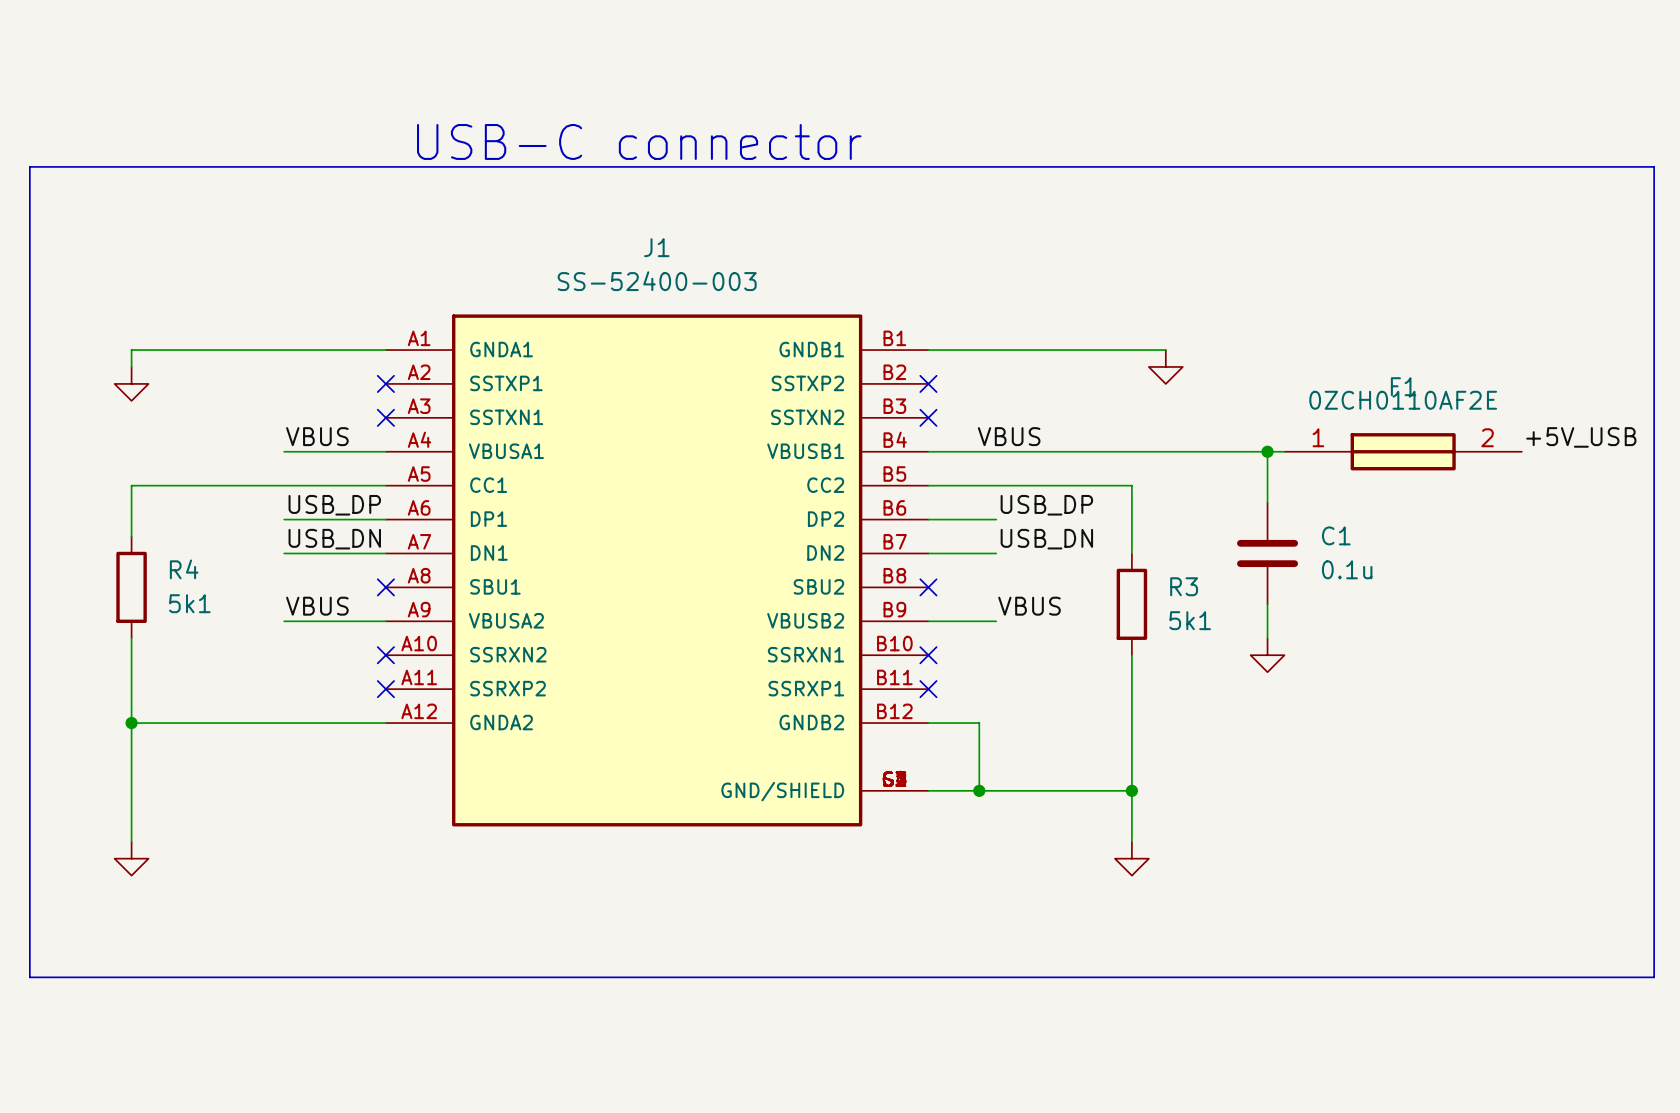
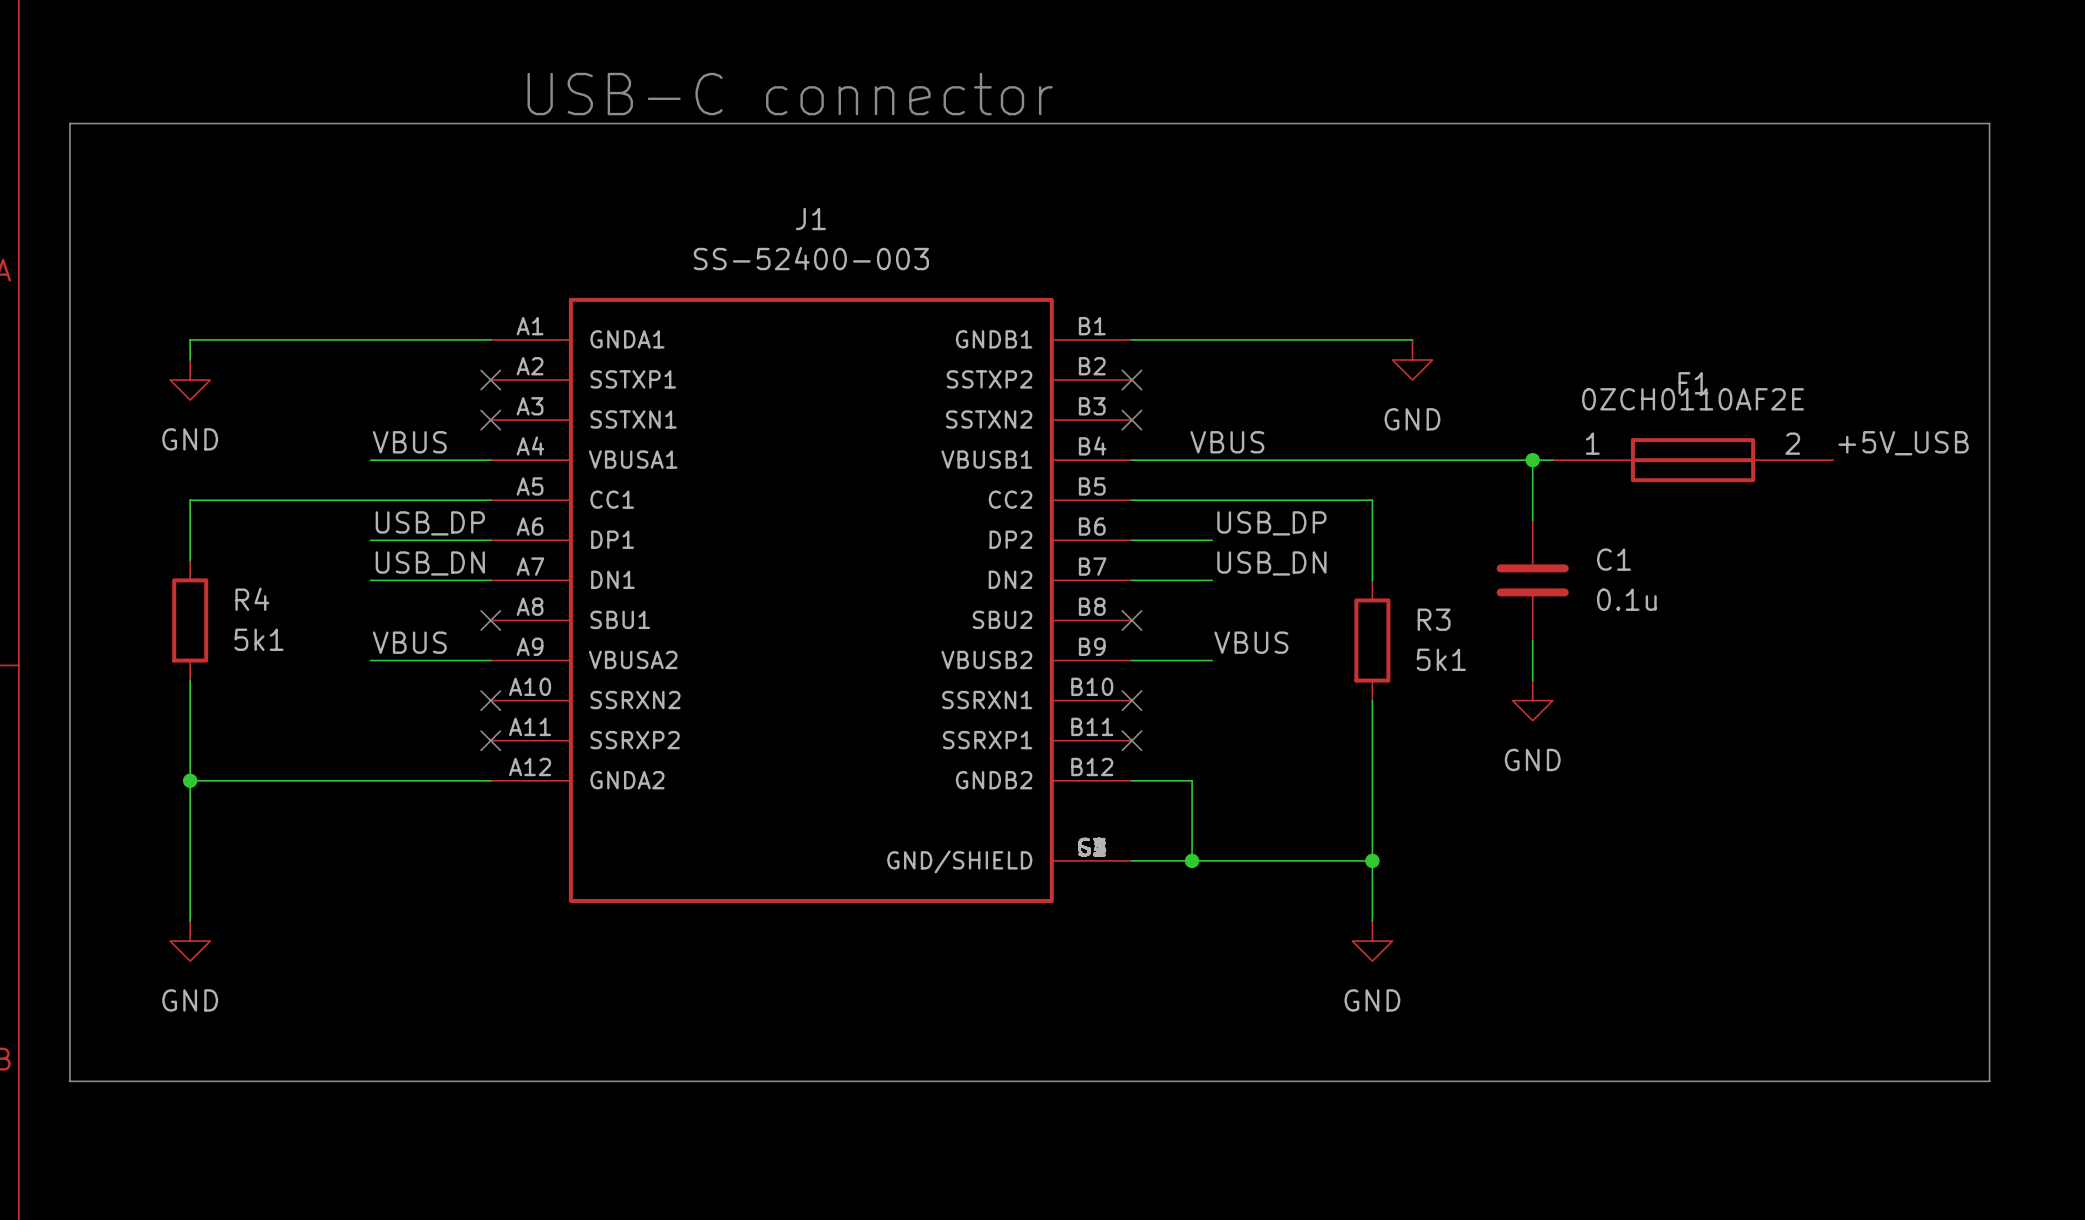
power symbol text: none -> GND (1412, 419)
power symbol text: none -> GND (190, 439)
power symbol text: none -> GND (1532, 759)
power symbol text: none -> GND (190, 1000)
power symbol text: none -> GND (1372, 1000)

